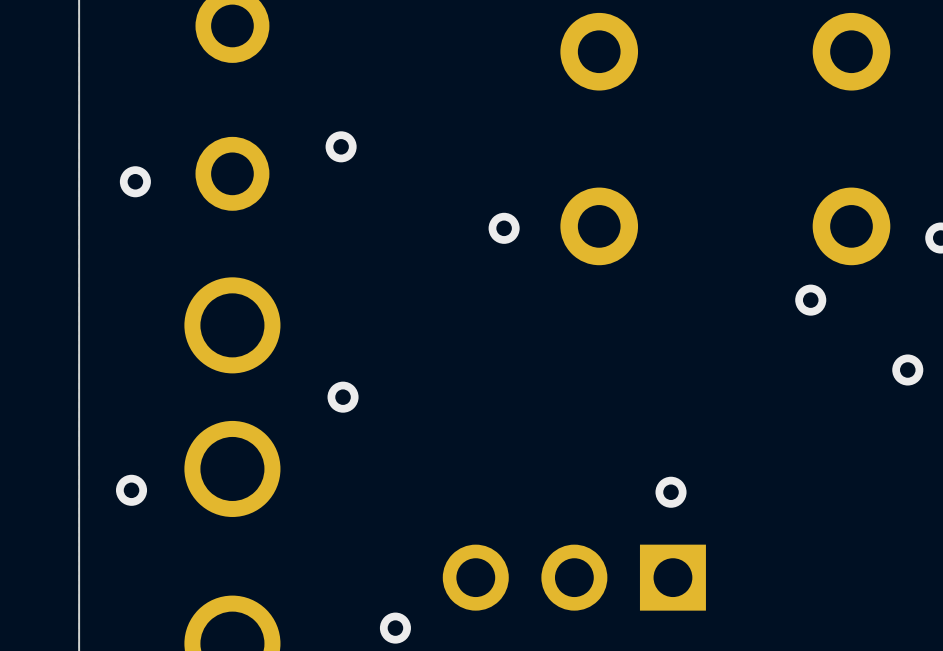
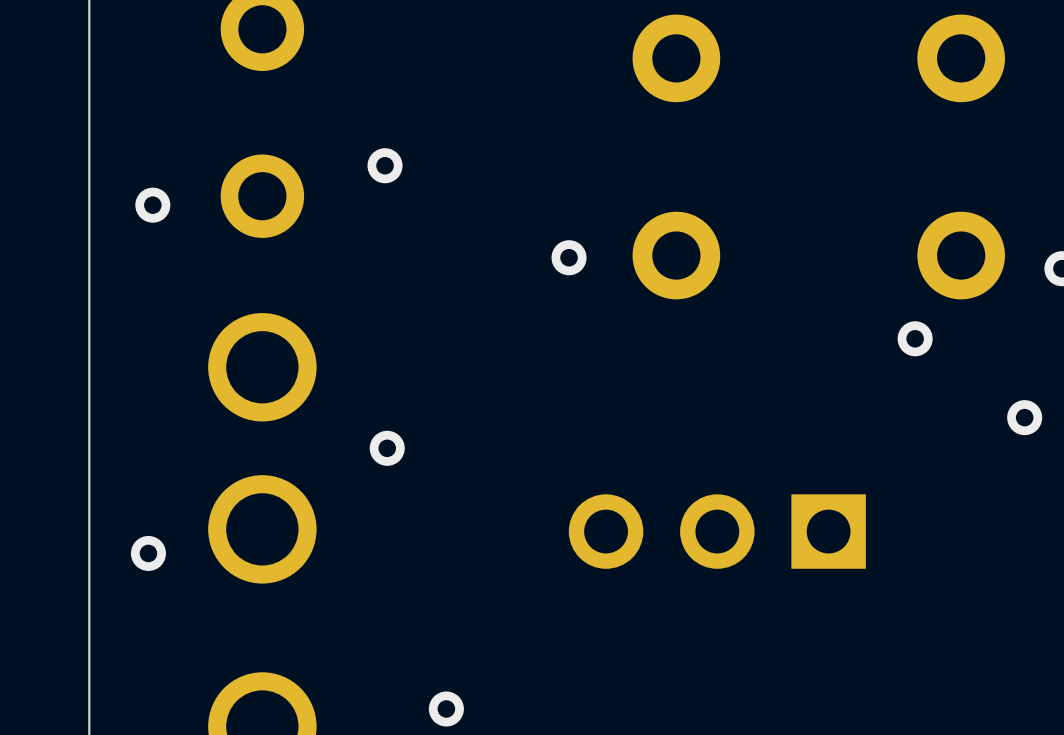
via: (671, 492) -> none
part position: (574, 577) -> (717, 531)

